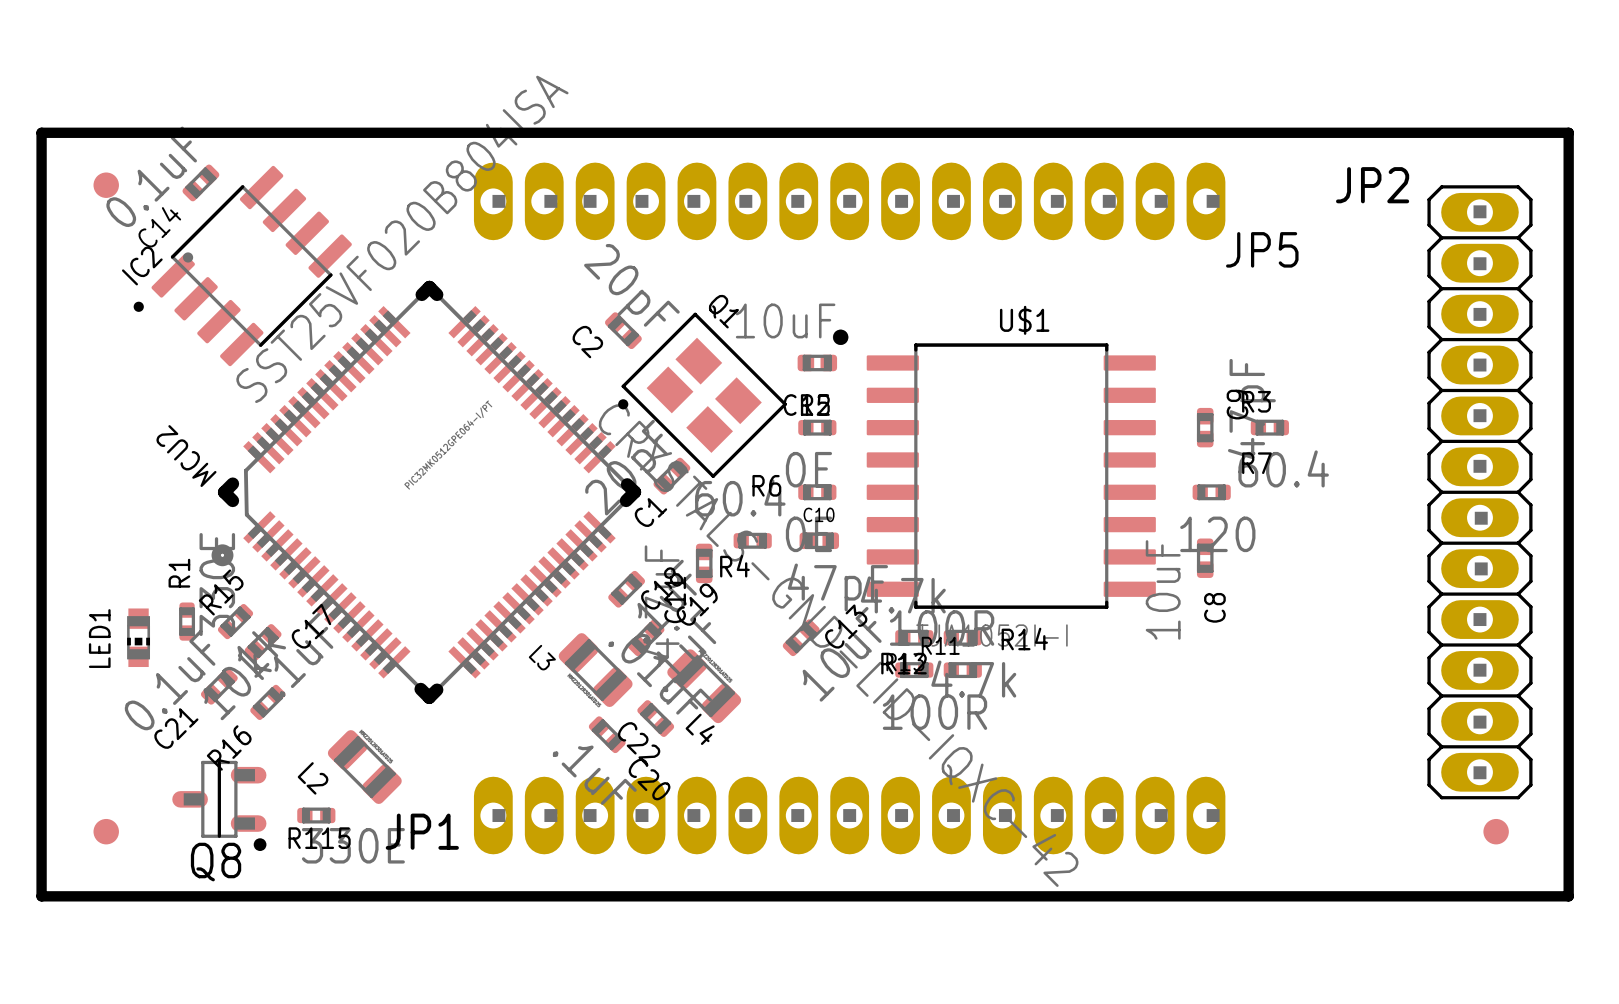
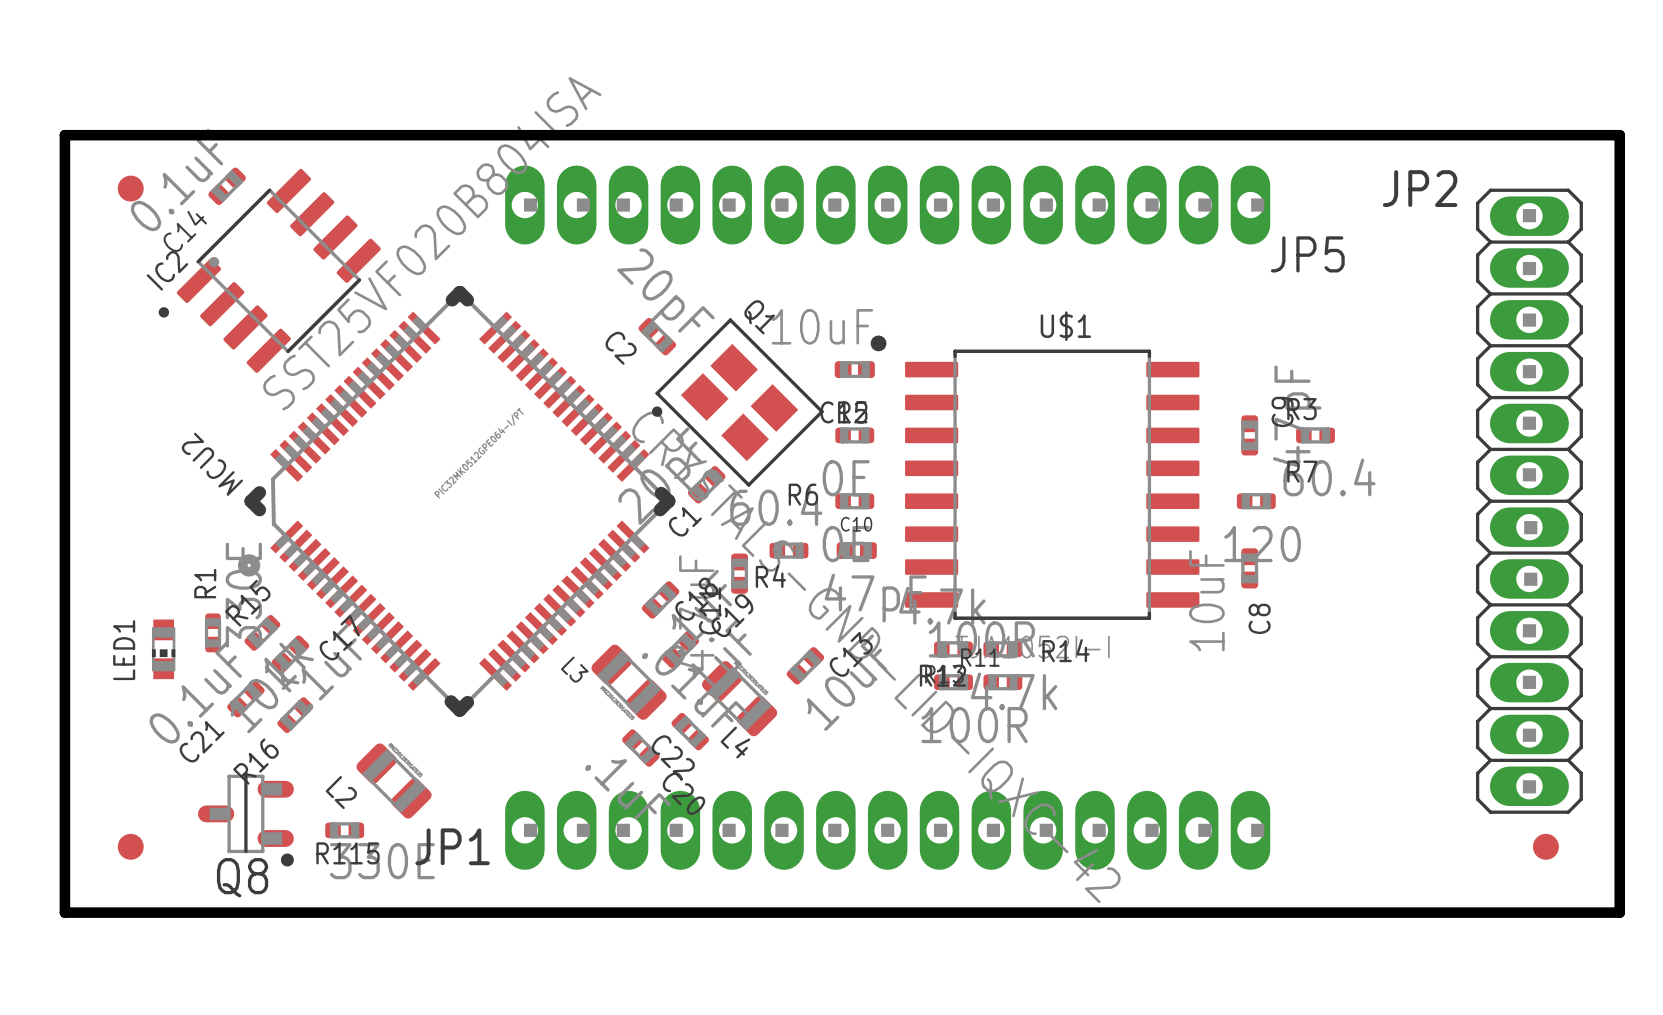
C13 position: (801, 637) -> (805, 665)

